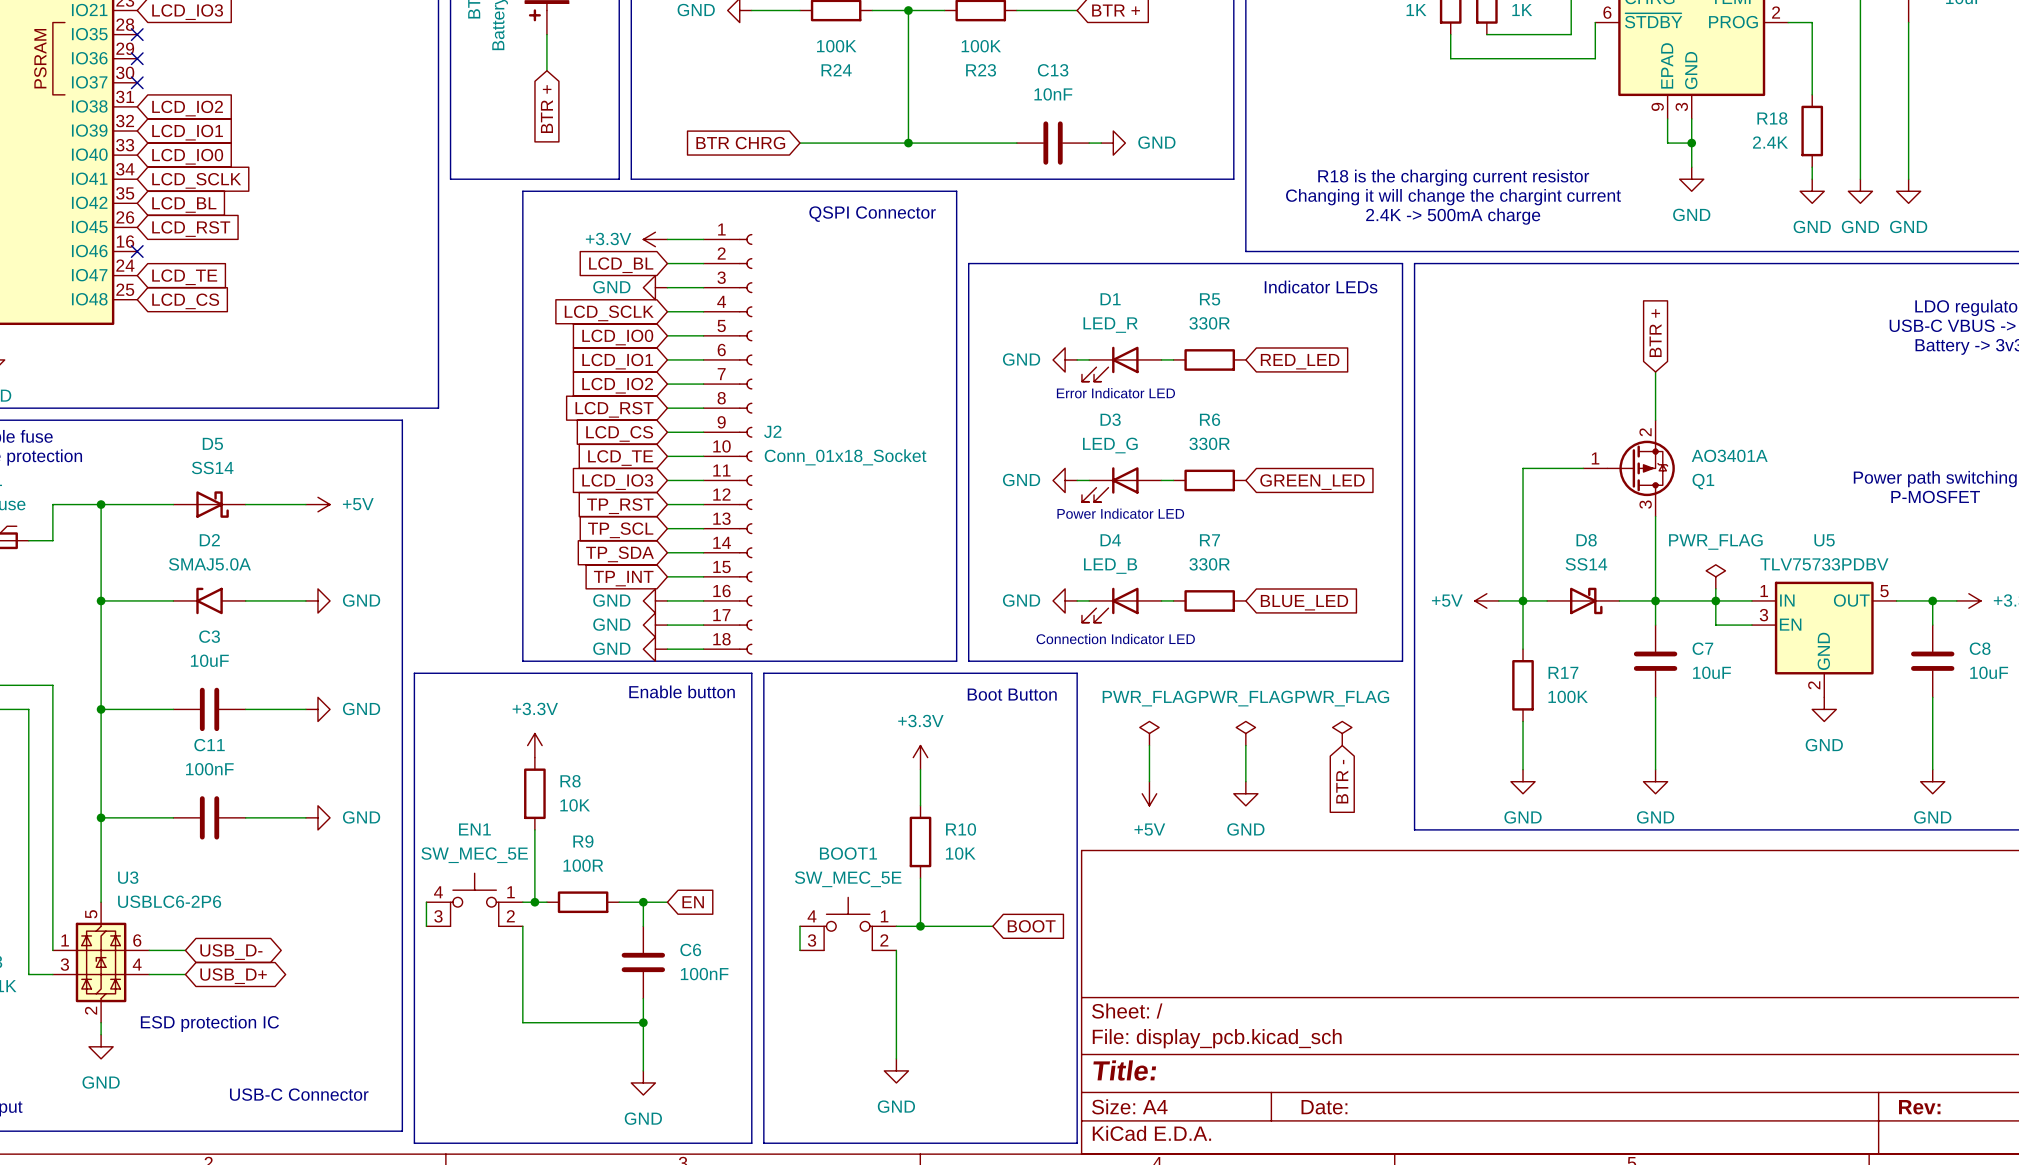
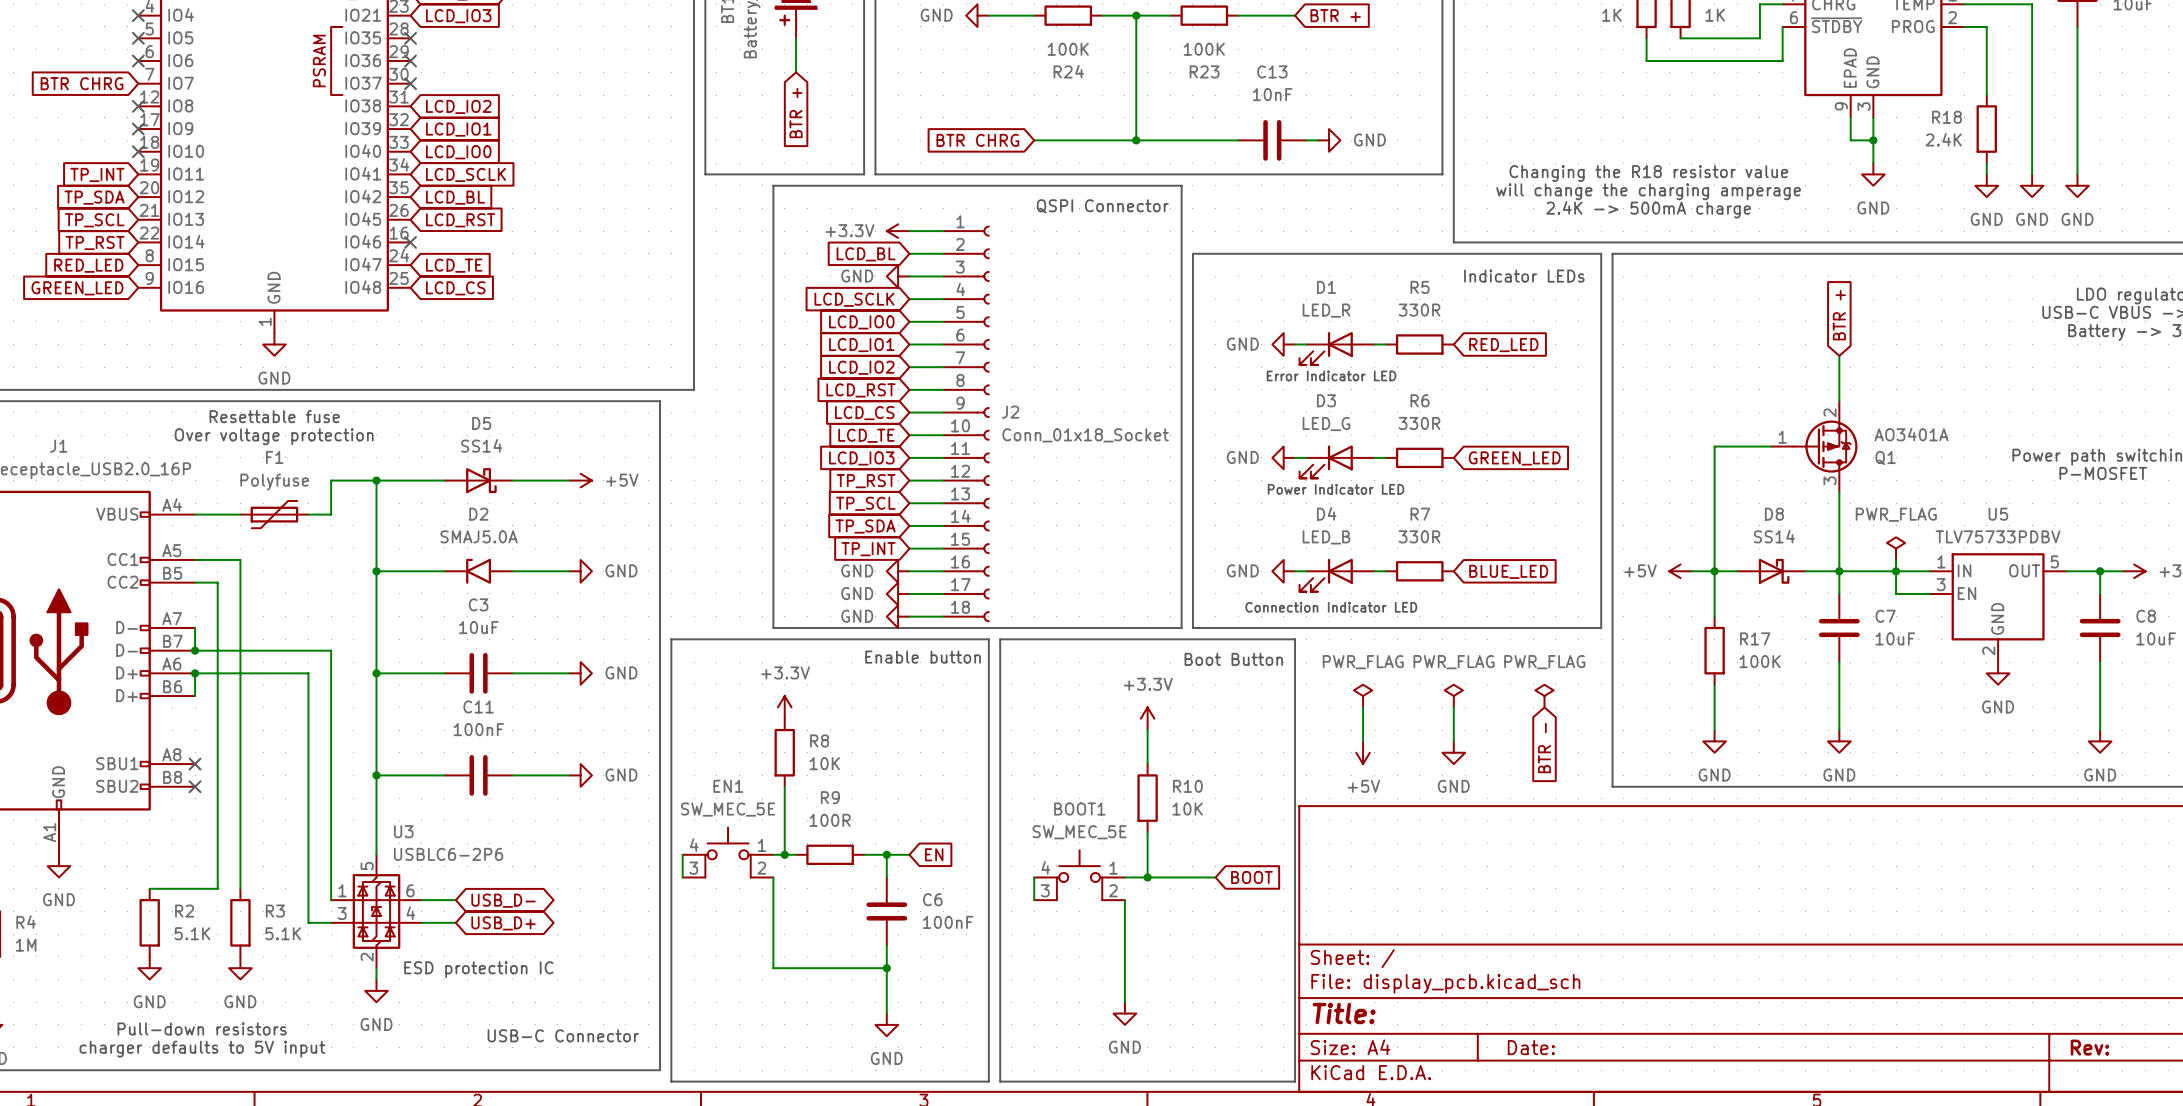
text: R18 is the charging current resistor (1453, 177) -> Changing the R18 resistor value (1648, 173)
text: Changing it will change the chargint current (1453, 197) -> will change the charging amperage (1648, 191)

